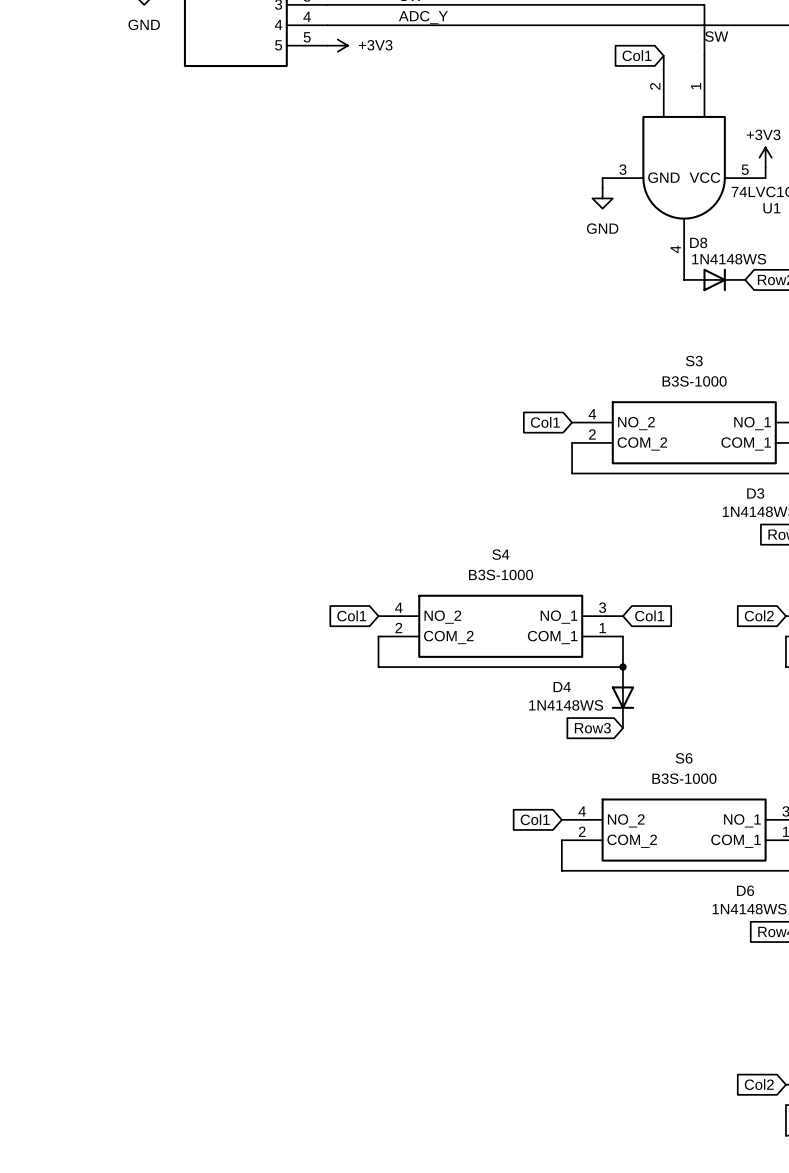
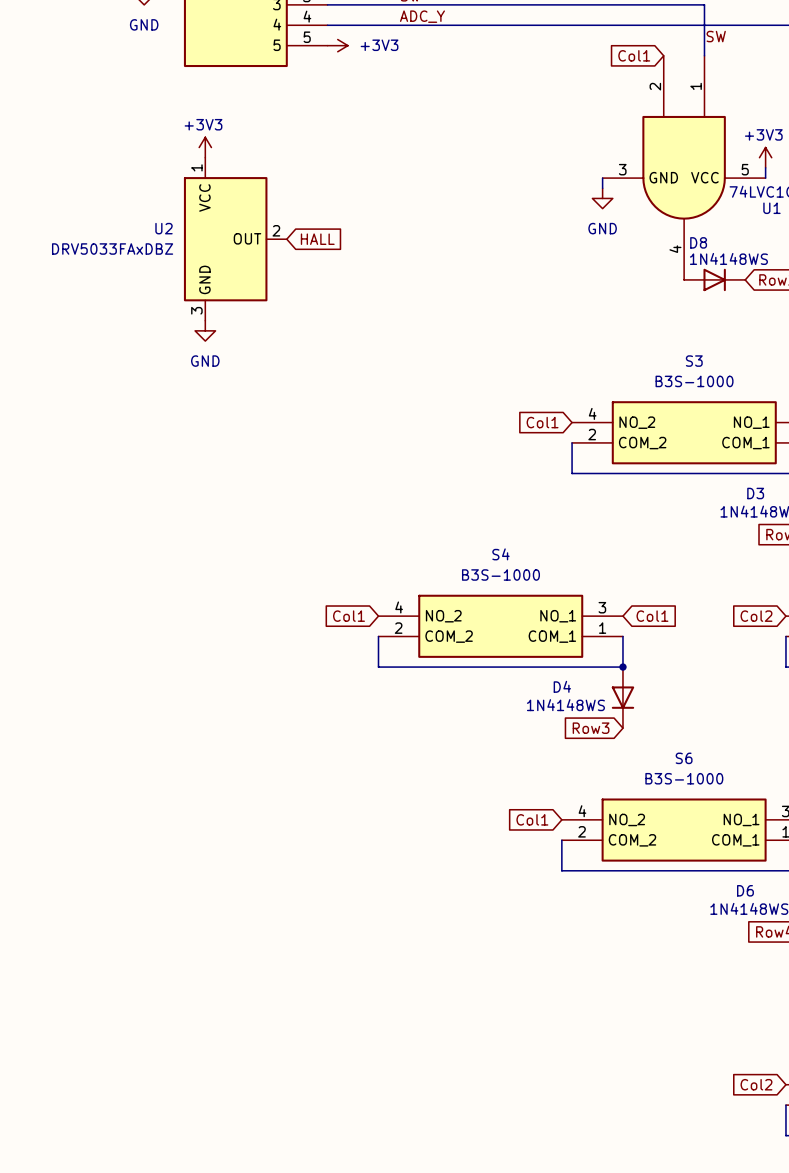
power symbol: none -> +3V3 (205, 147)
U2: none -> DRV5033FAxDBZ (235, 239)
global label: none -> HALL (317, 239)
power symbol: none -> GND (205, 330)

